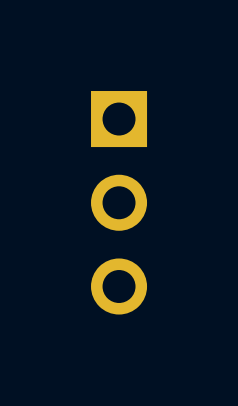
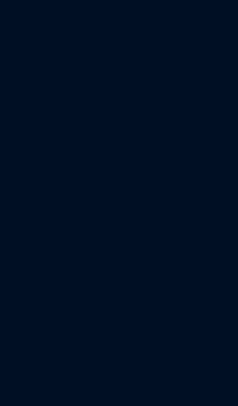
part: (119, 202) -> none

